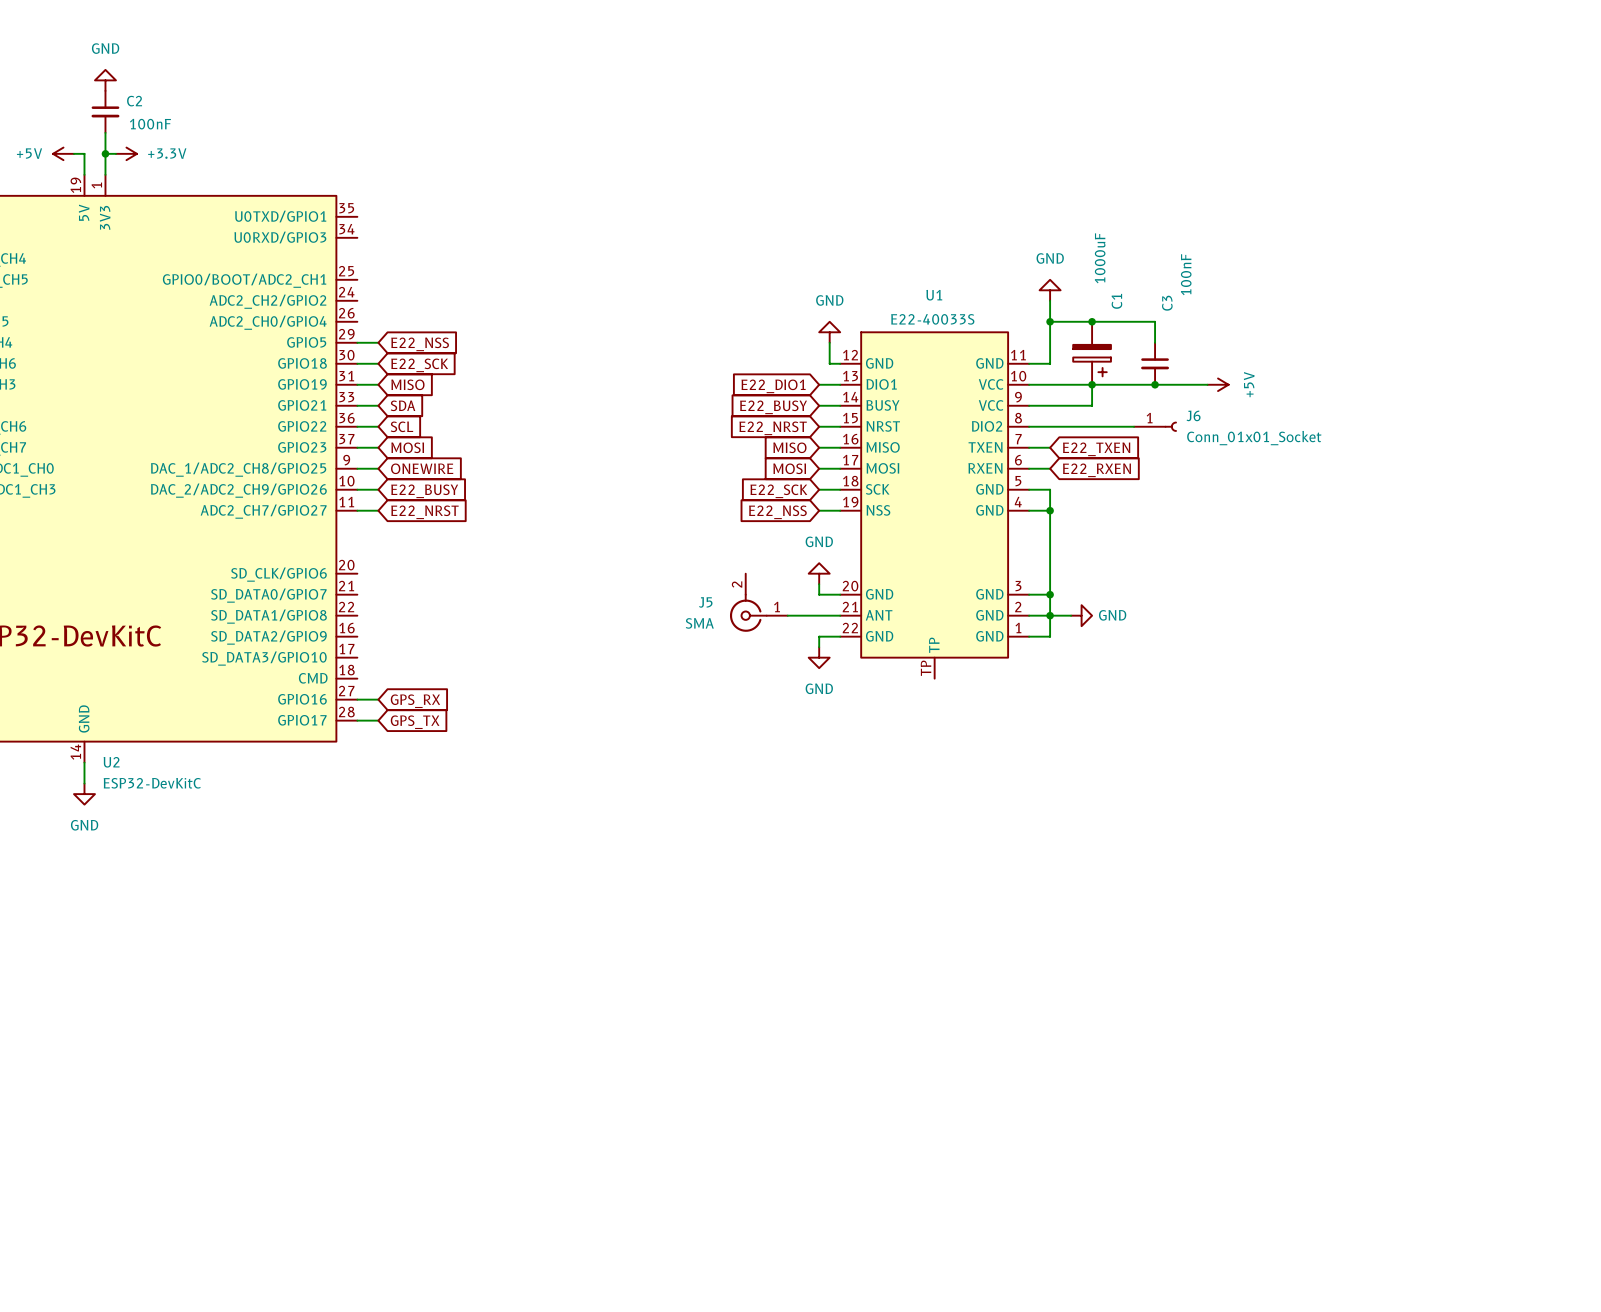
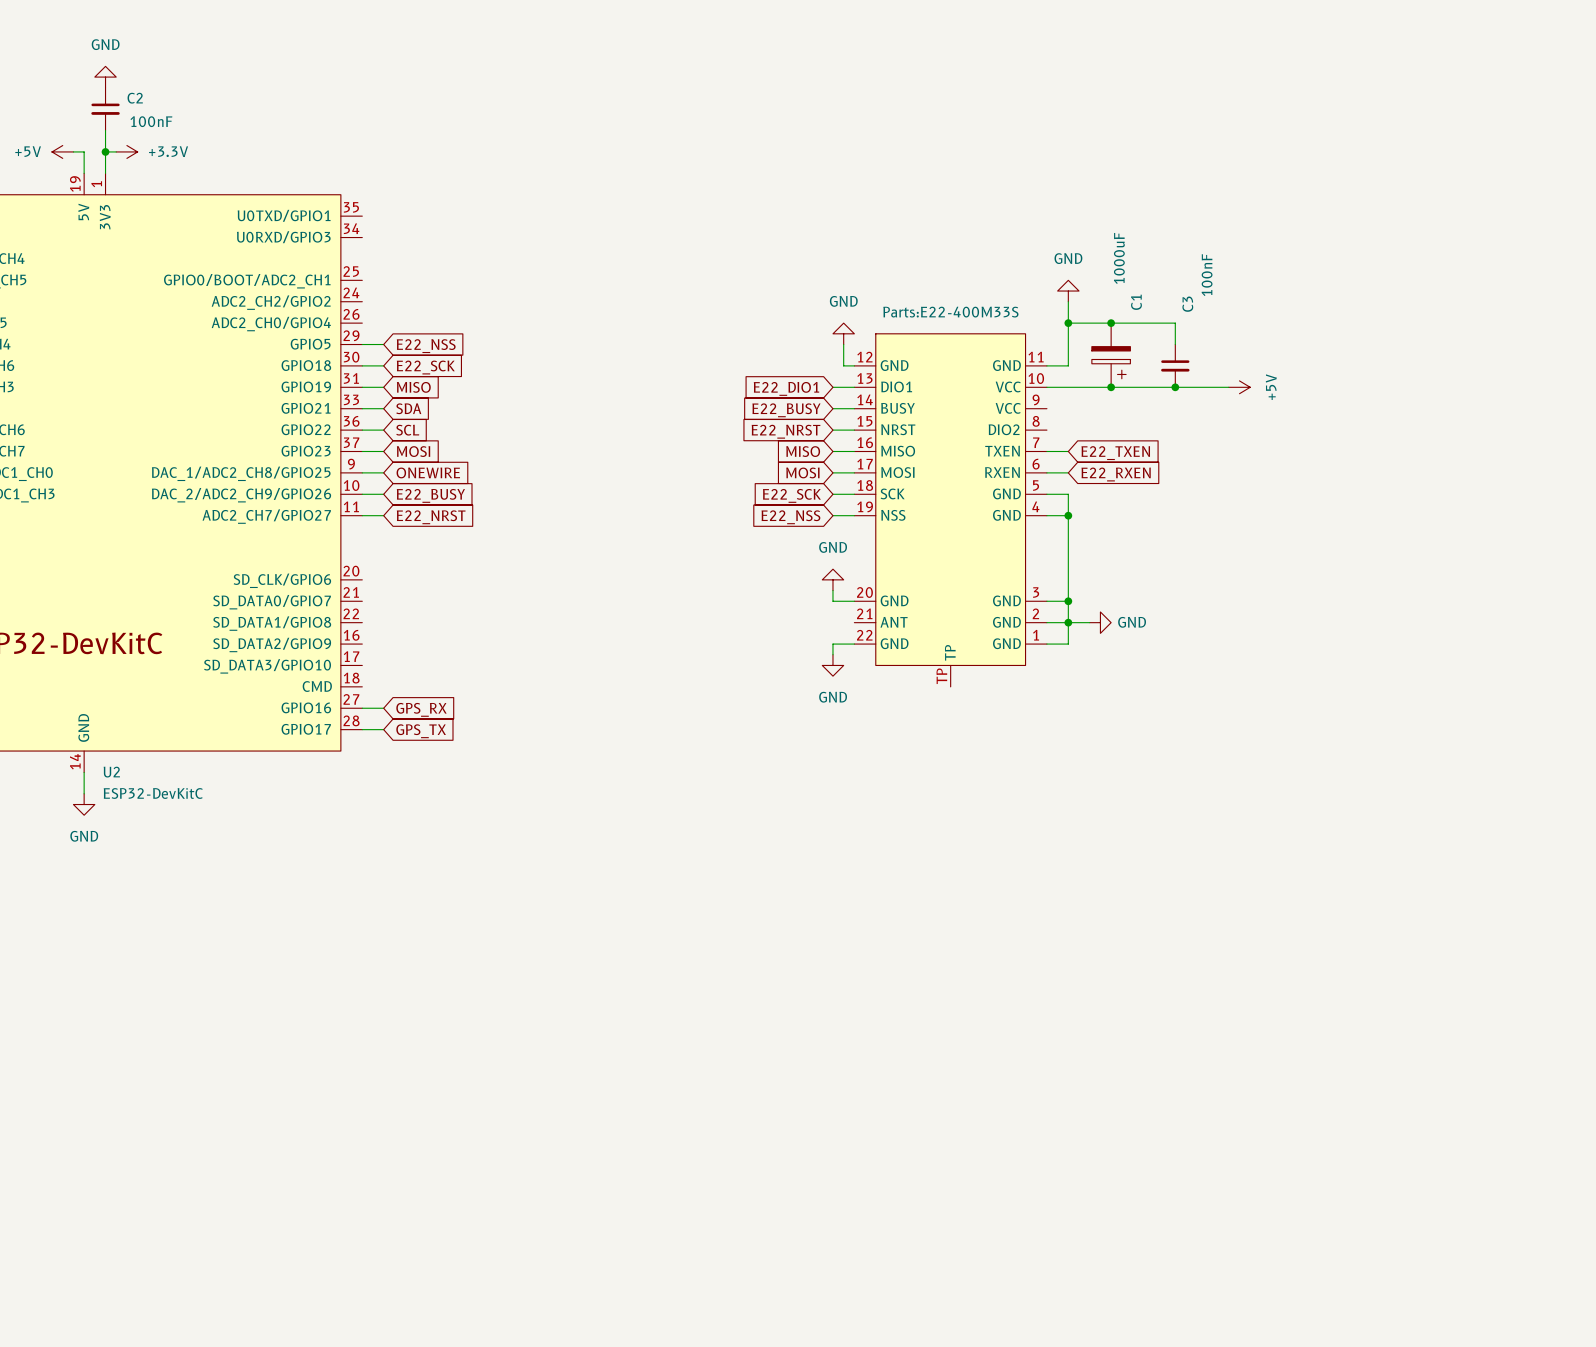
U1 name: U1 (934, 295) -> none
U1 text: none -> Parts:E22-400M33S (950, 312)
U1 value: E22-40033S (932, 319) -> none
wire: (1092, 384) (1092, 405) (1029, 405) -> none
wire: (1029, 426) (1134, 426) -> none
J6: Conn_01x01_Socket (1155, 426) -> none
J5: SMA (758, 602) -> none
wire: (787, 615) (840, 615) -> none

